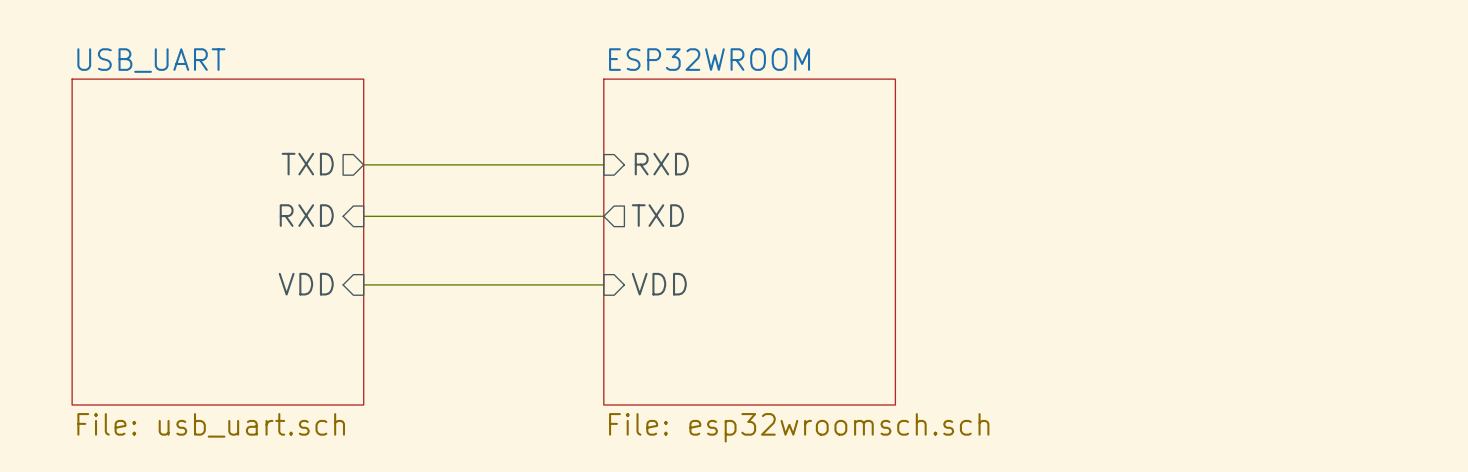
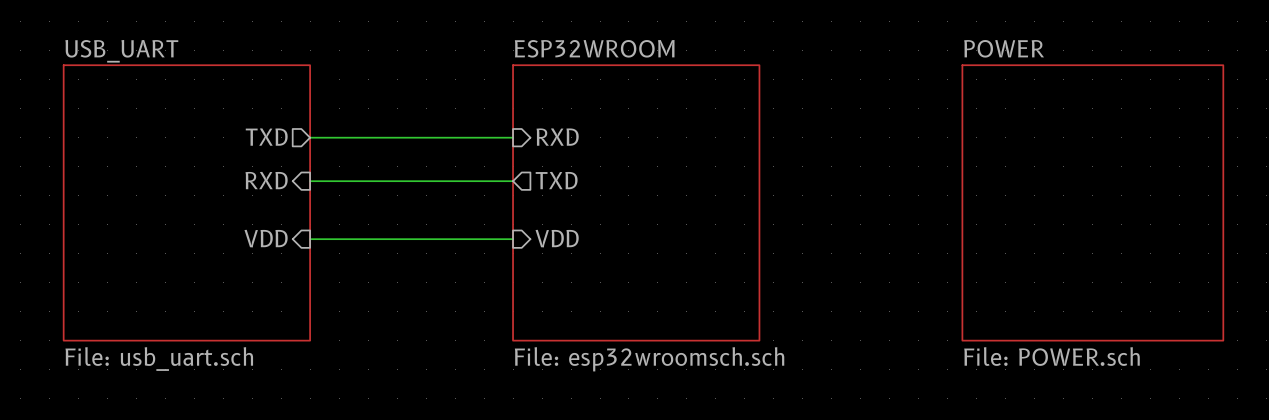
sheet POWER: none -> File: POWER.sch (1092, 202)

